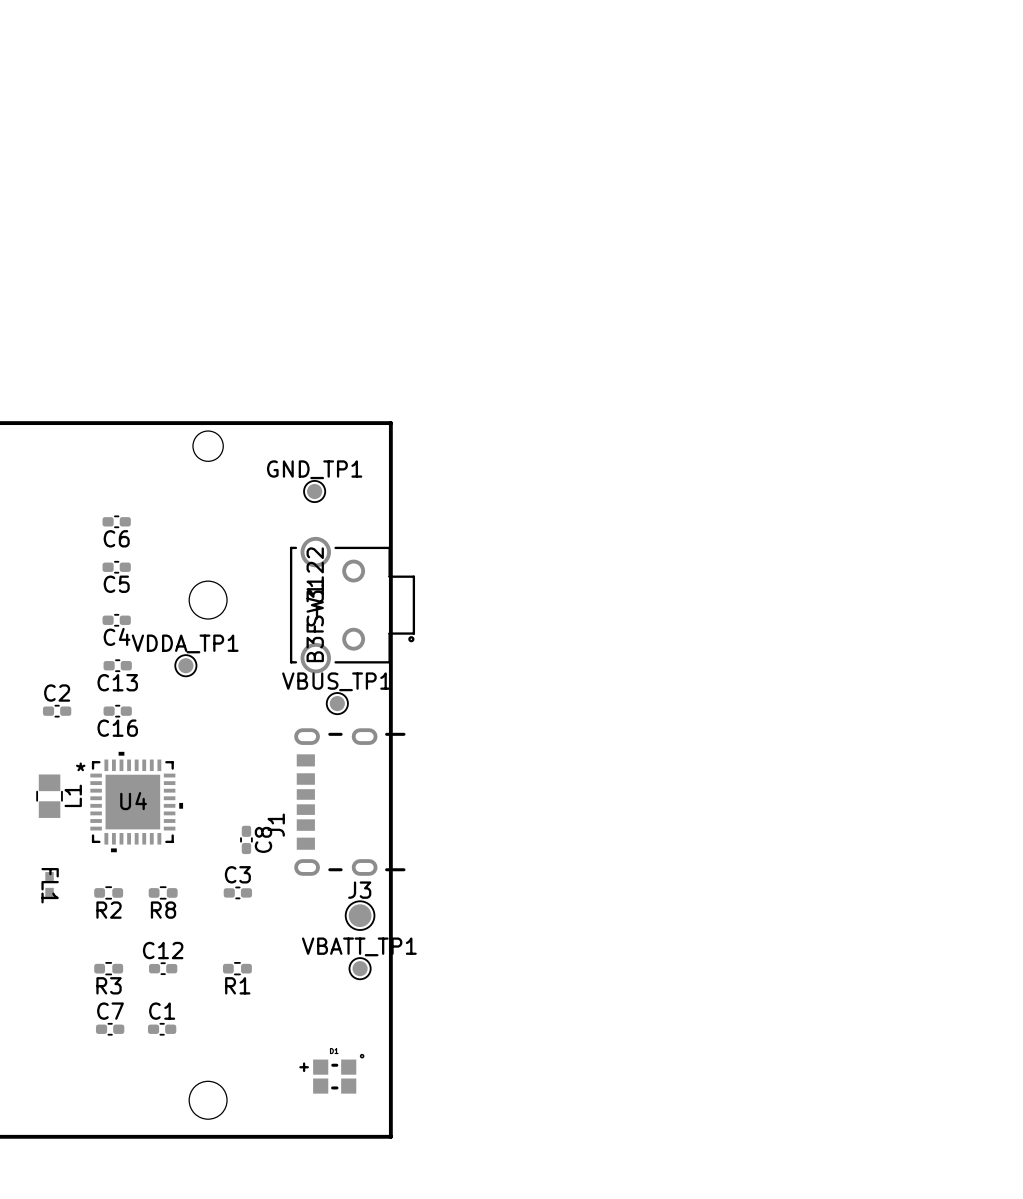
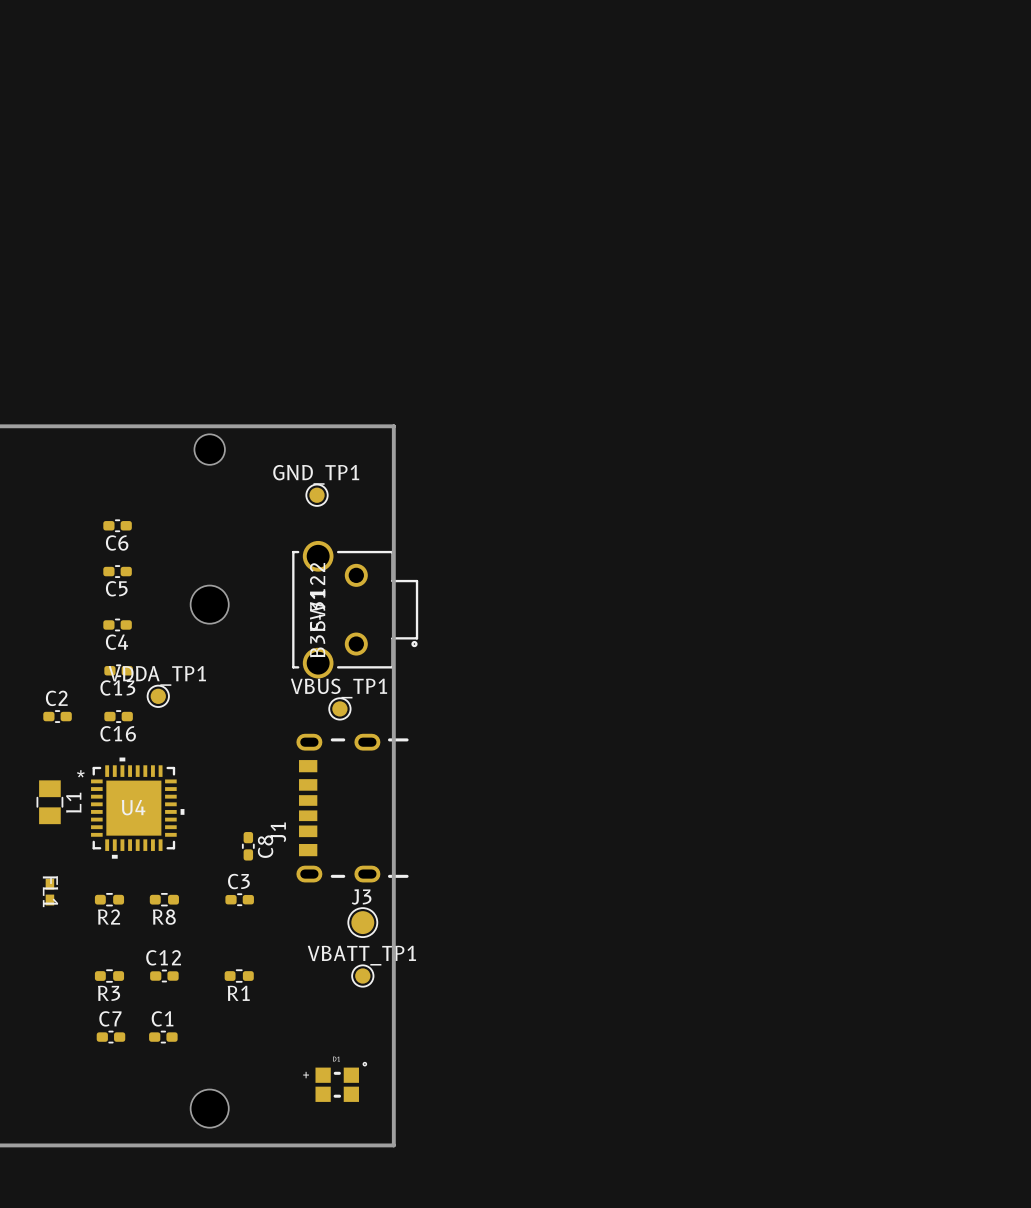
VDDA_TP1 position: (185, 665) -> (158, 696)

